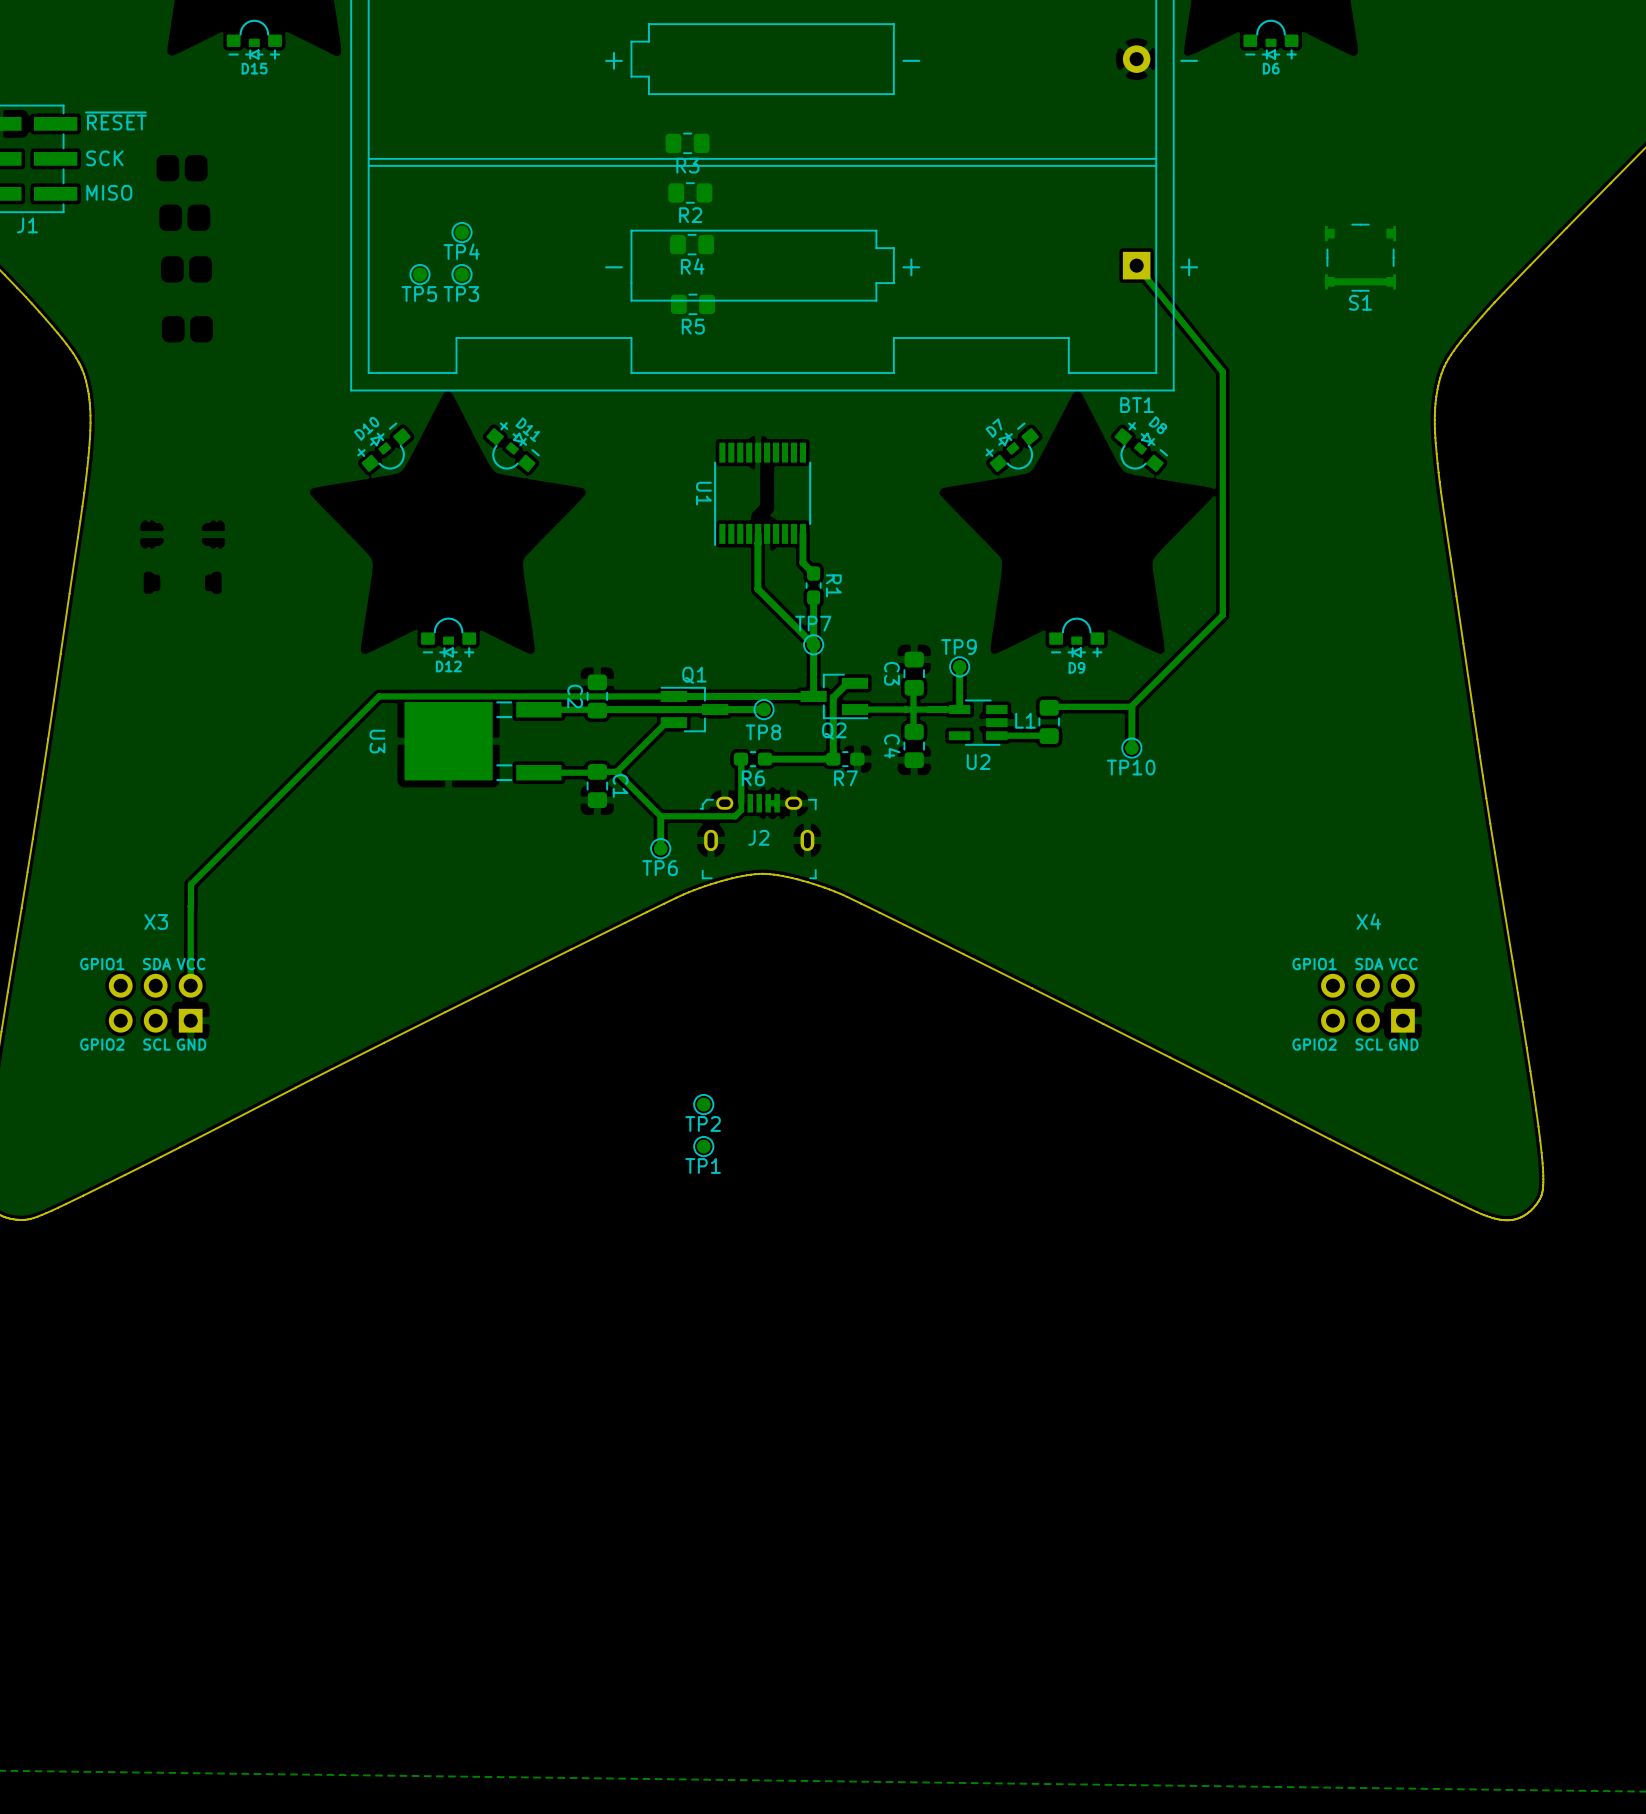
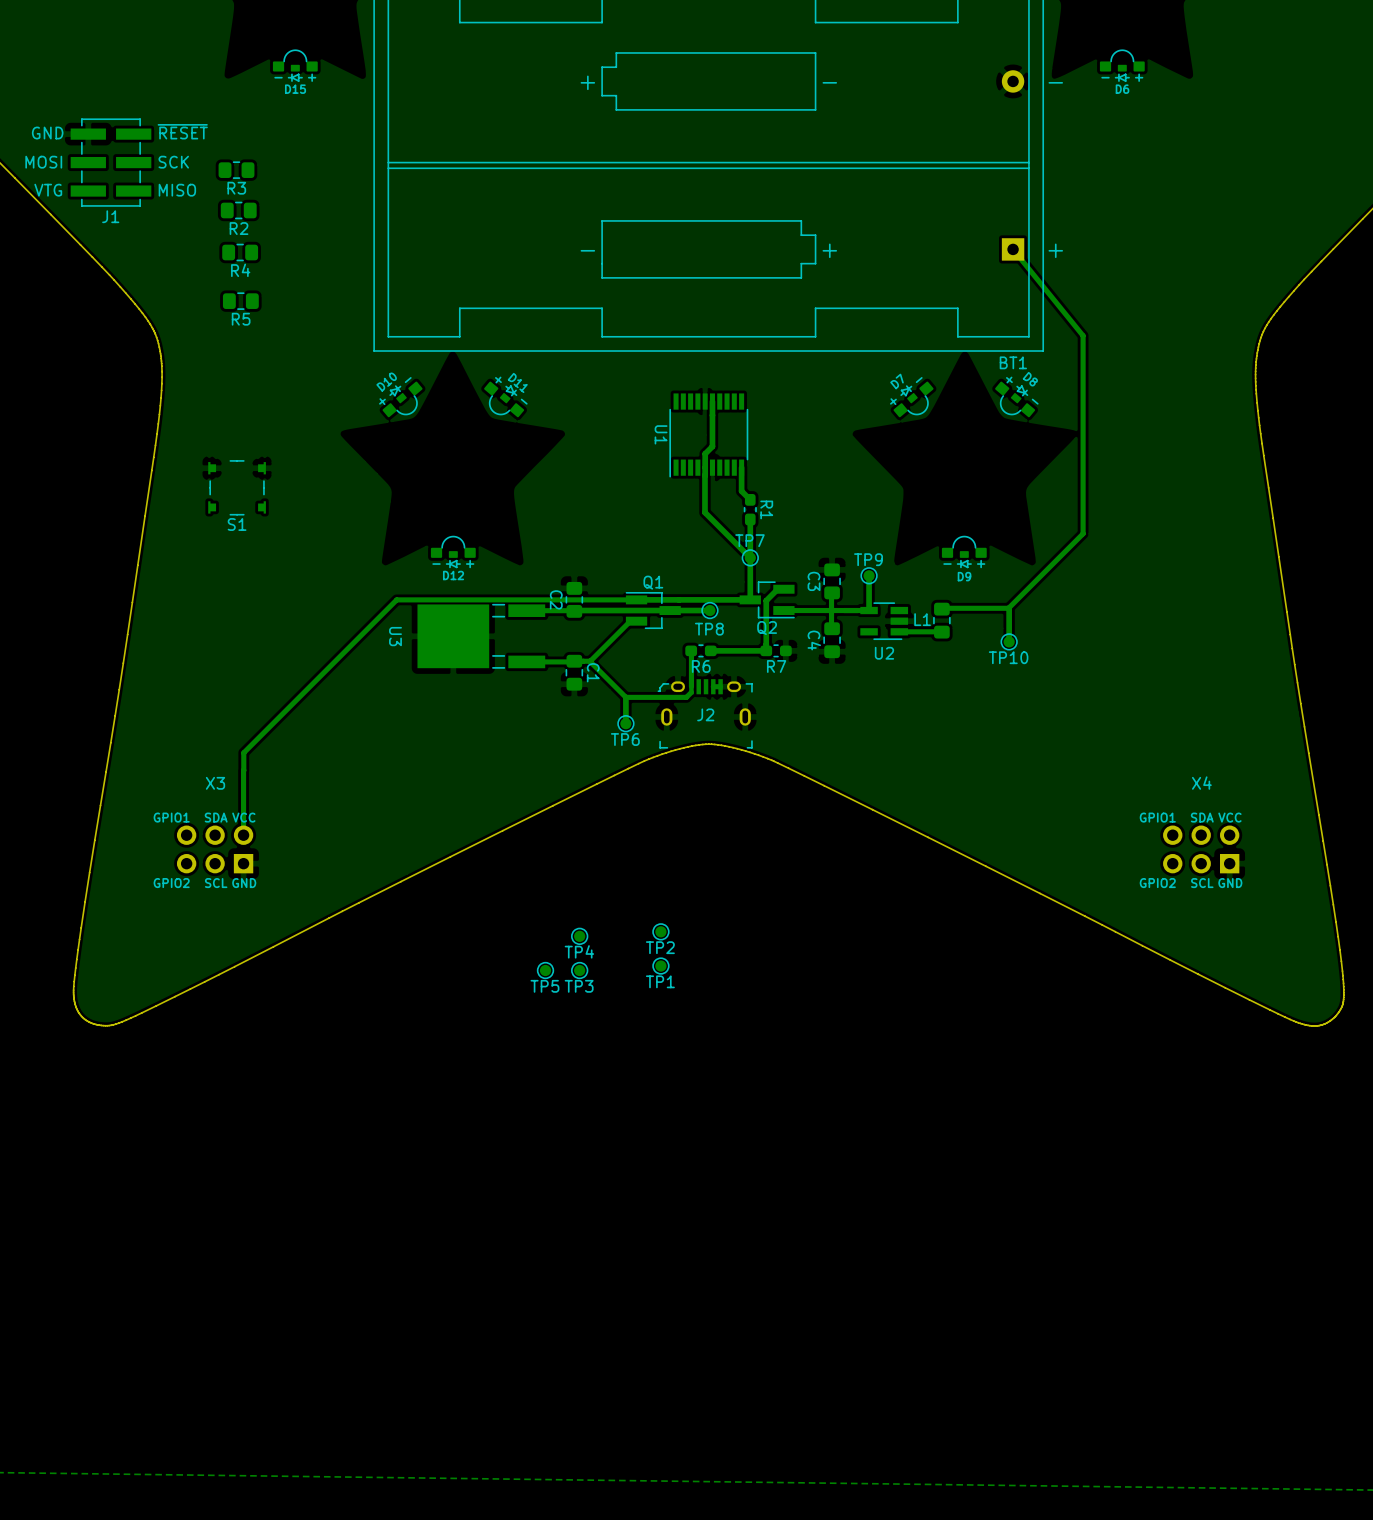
R3 position: (687, 143) -> (236, 170)
R2 position: (690, 192) -> (238, 210)
TP4 position: (462, 232) -> (579, 936)
R4 position: (692, 244) -> (240, 252)
S1 position: (1360, 257) -> (237, 487)
TP5 position: (419, 274) -> (545, 970)
TP3 position: (462, 274) -> (579, 970)
track: (1389, 281) (1331, 281) -> none
R5 position: (692, 304) -> (240, 301)
track: none -> (712, 401) (712, 446) (705, 453) (705, 467)

